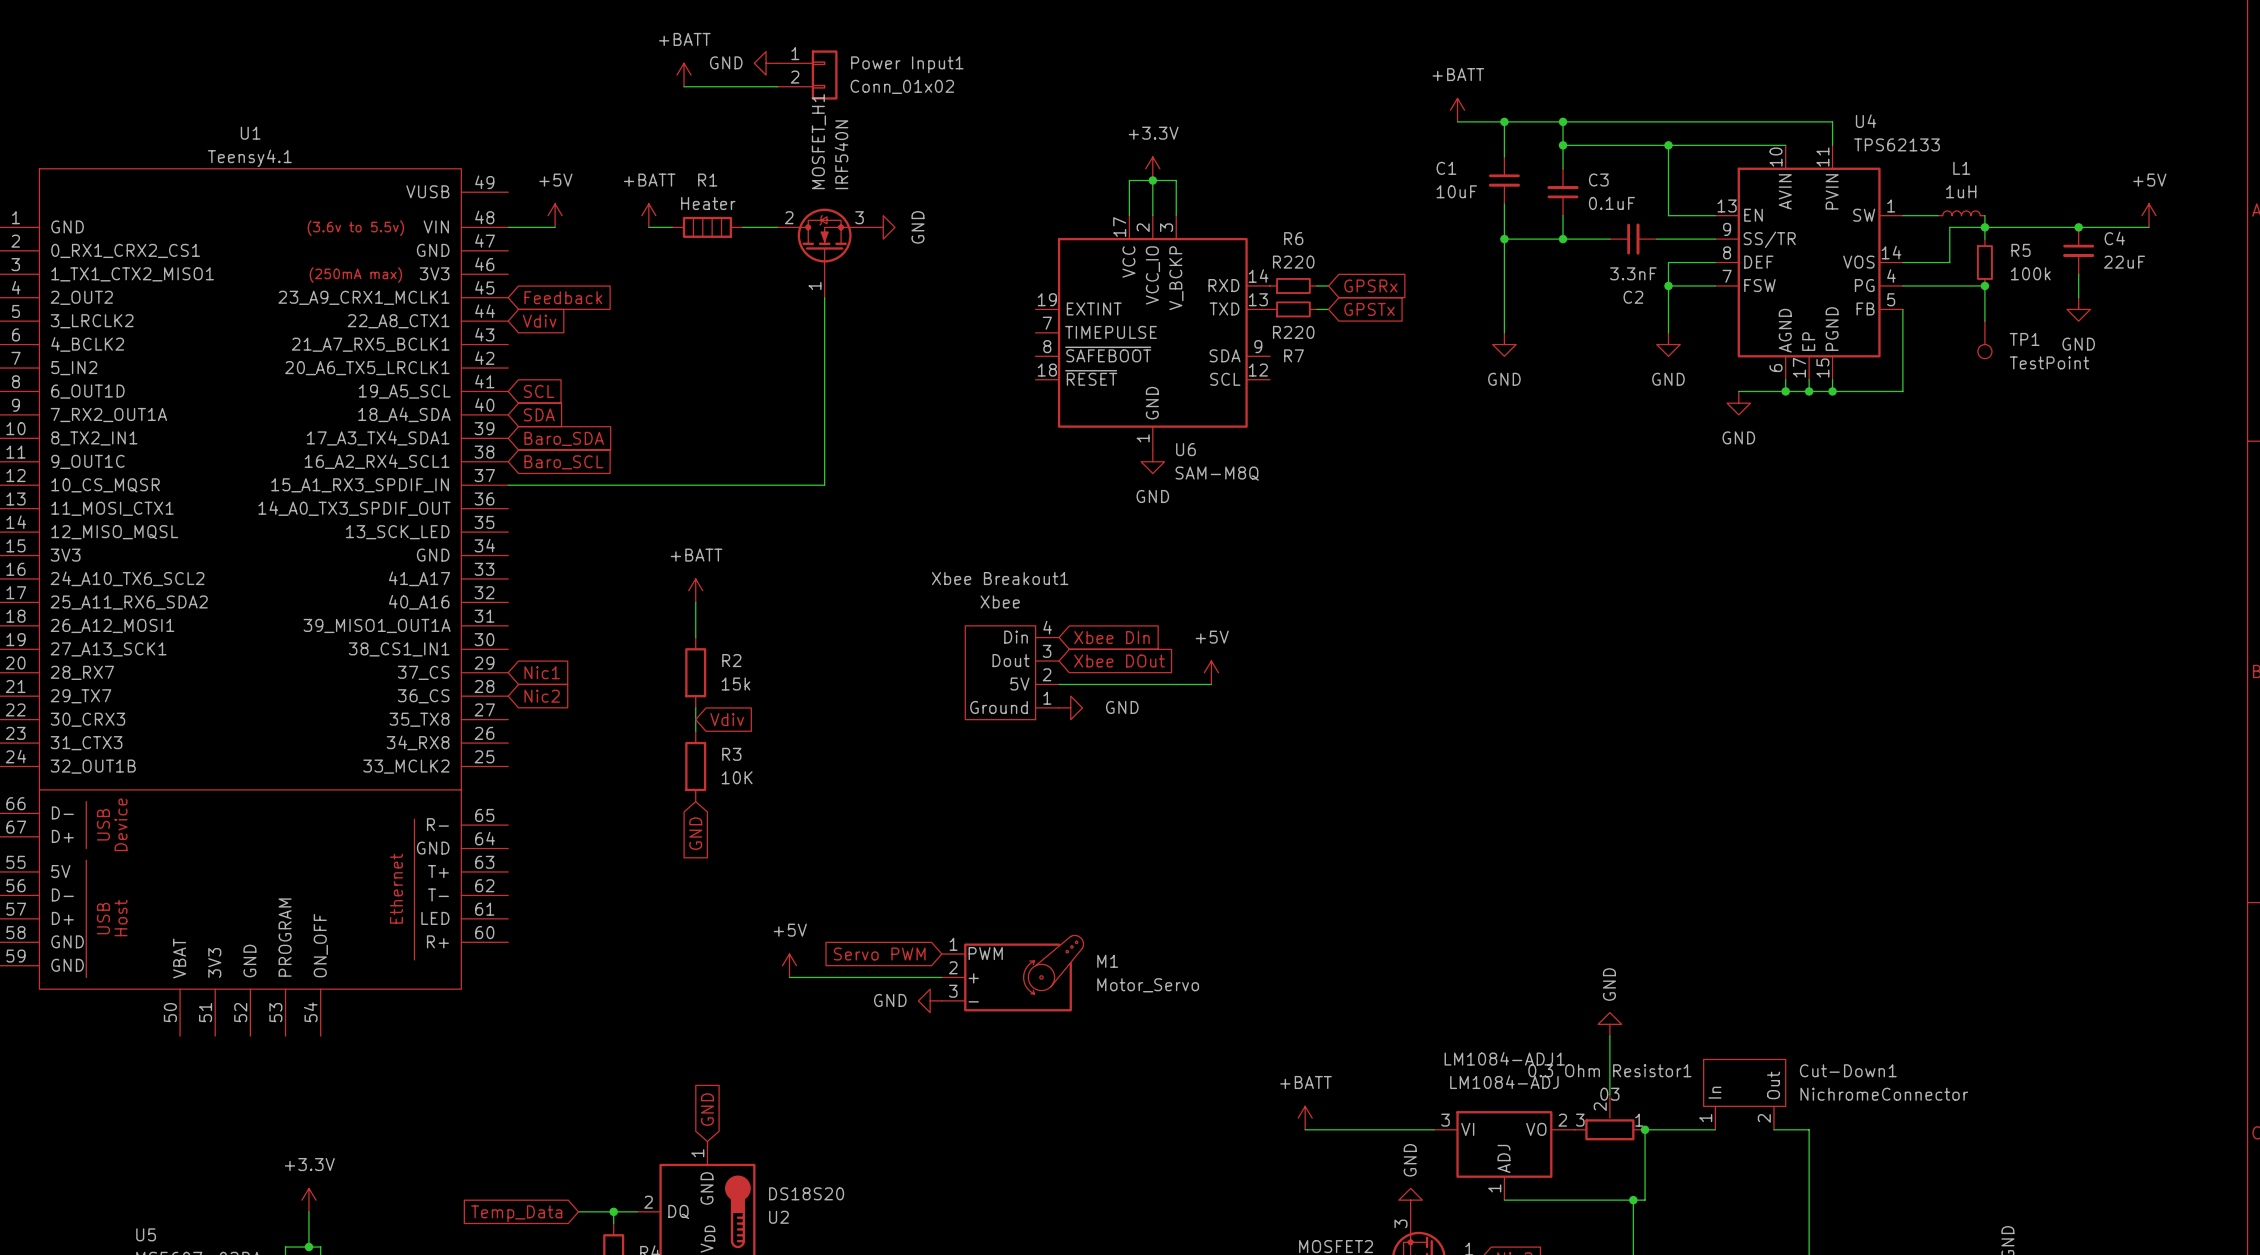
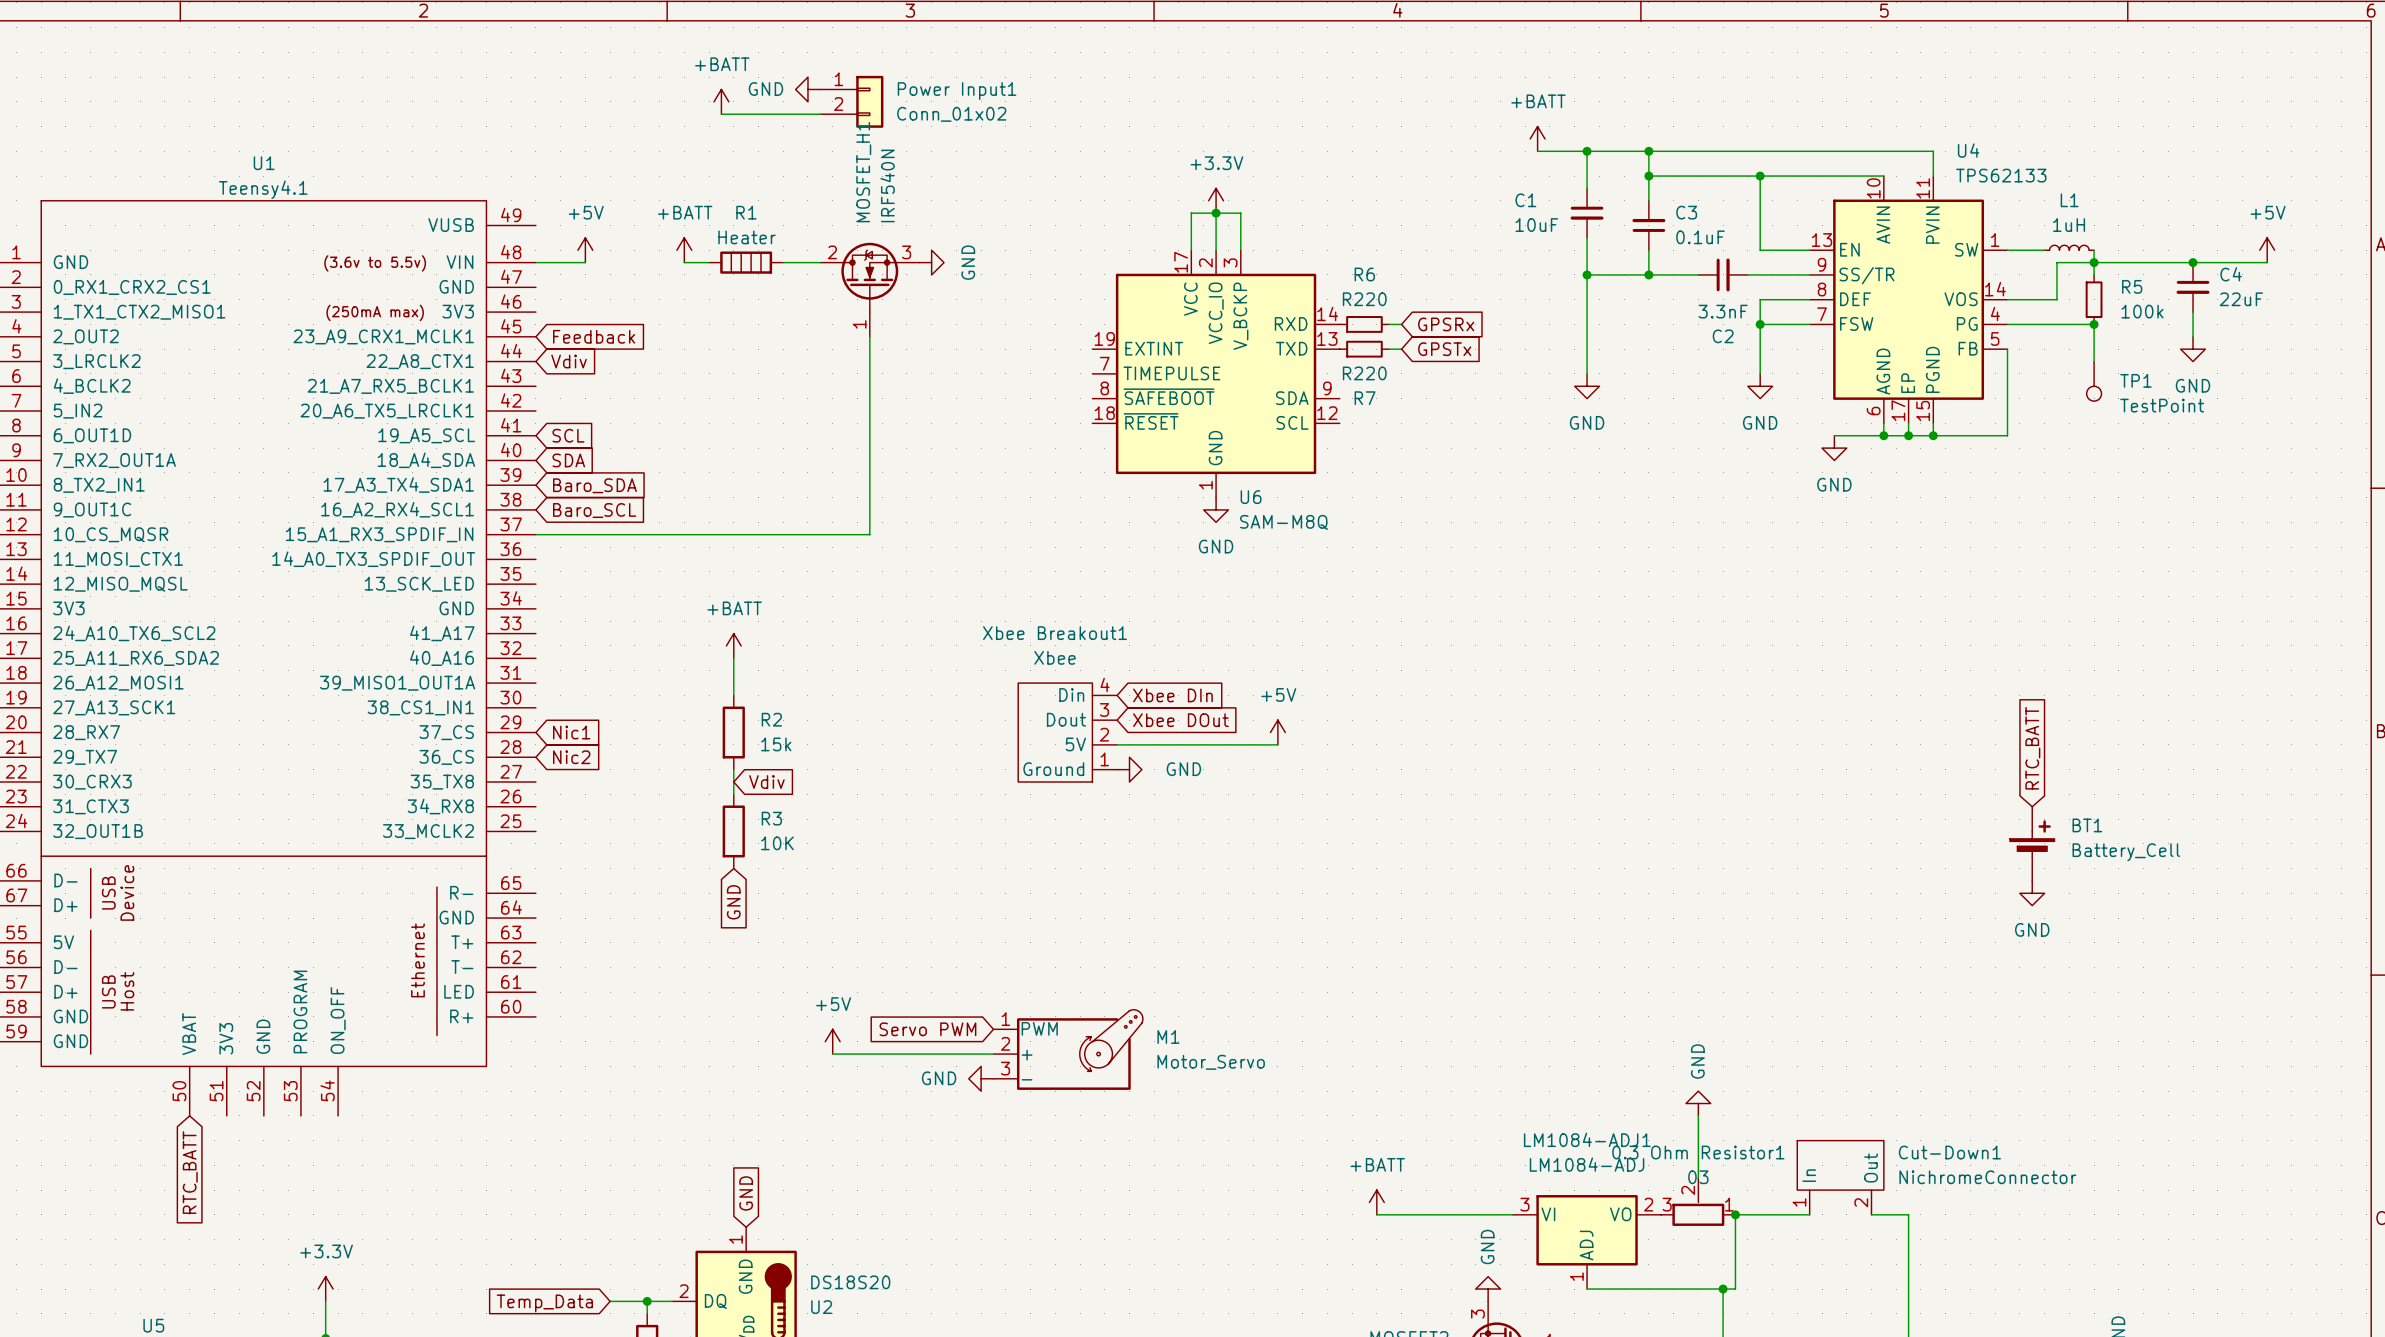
global label: none -> RTC_BATT (2032, 748)
BT1: none -> Battery_Cell (2032, 843)
power symbol: none -> GND (2032, 893)
global label: none -> RTC_BATT (190, 1172)

